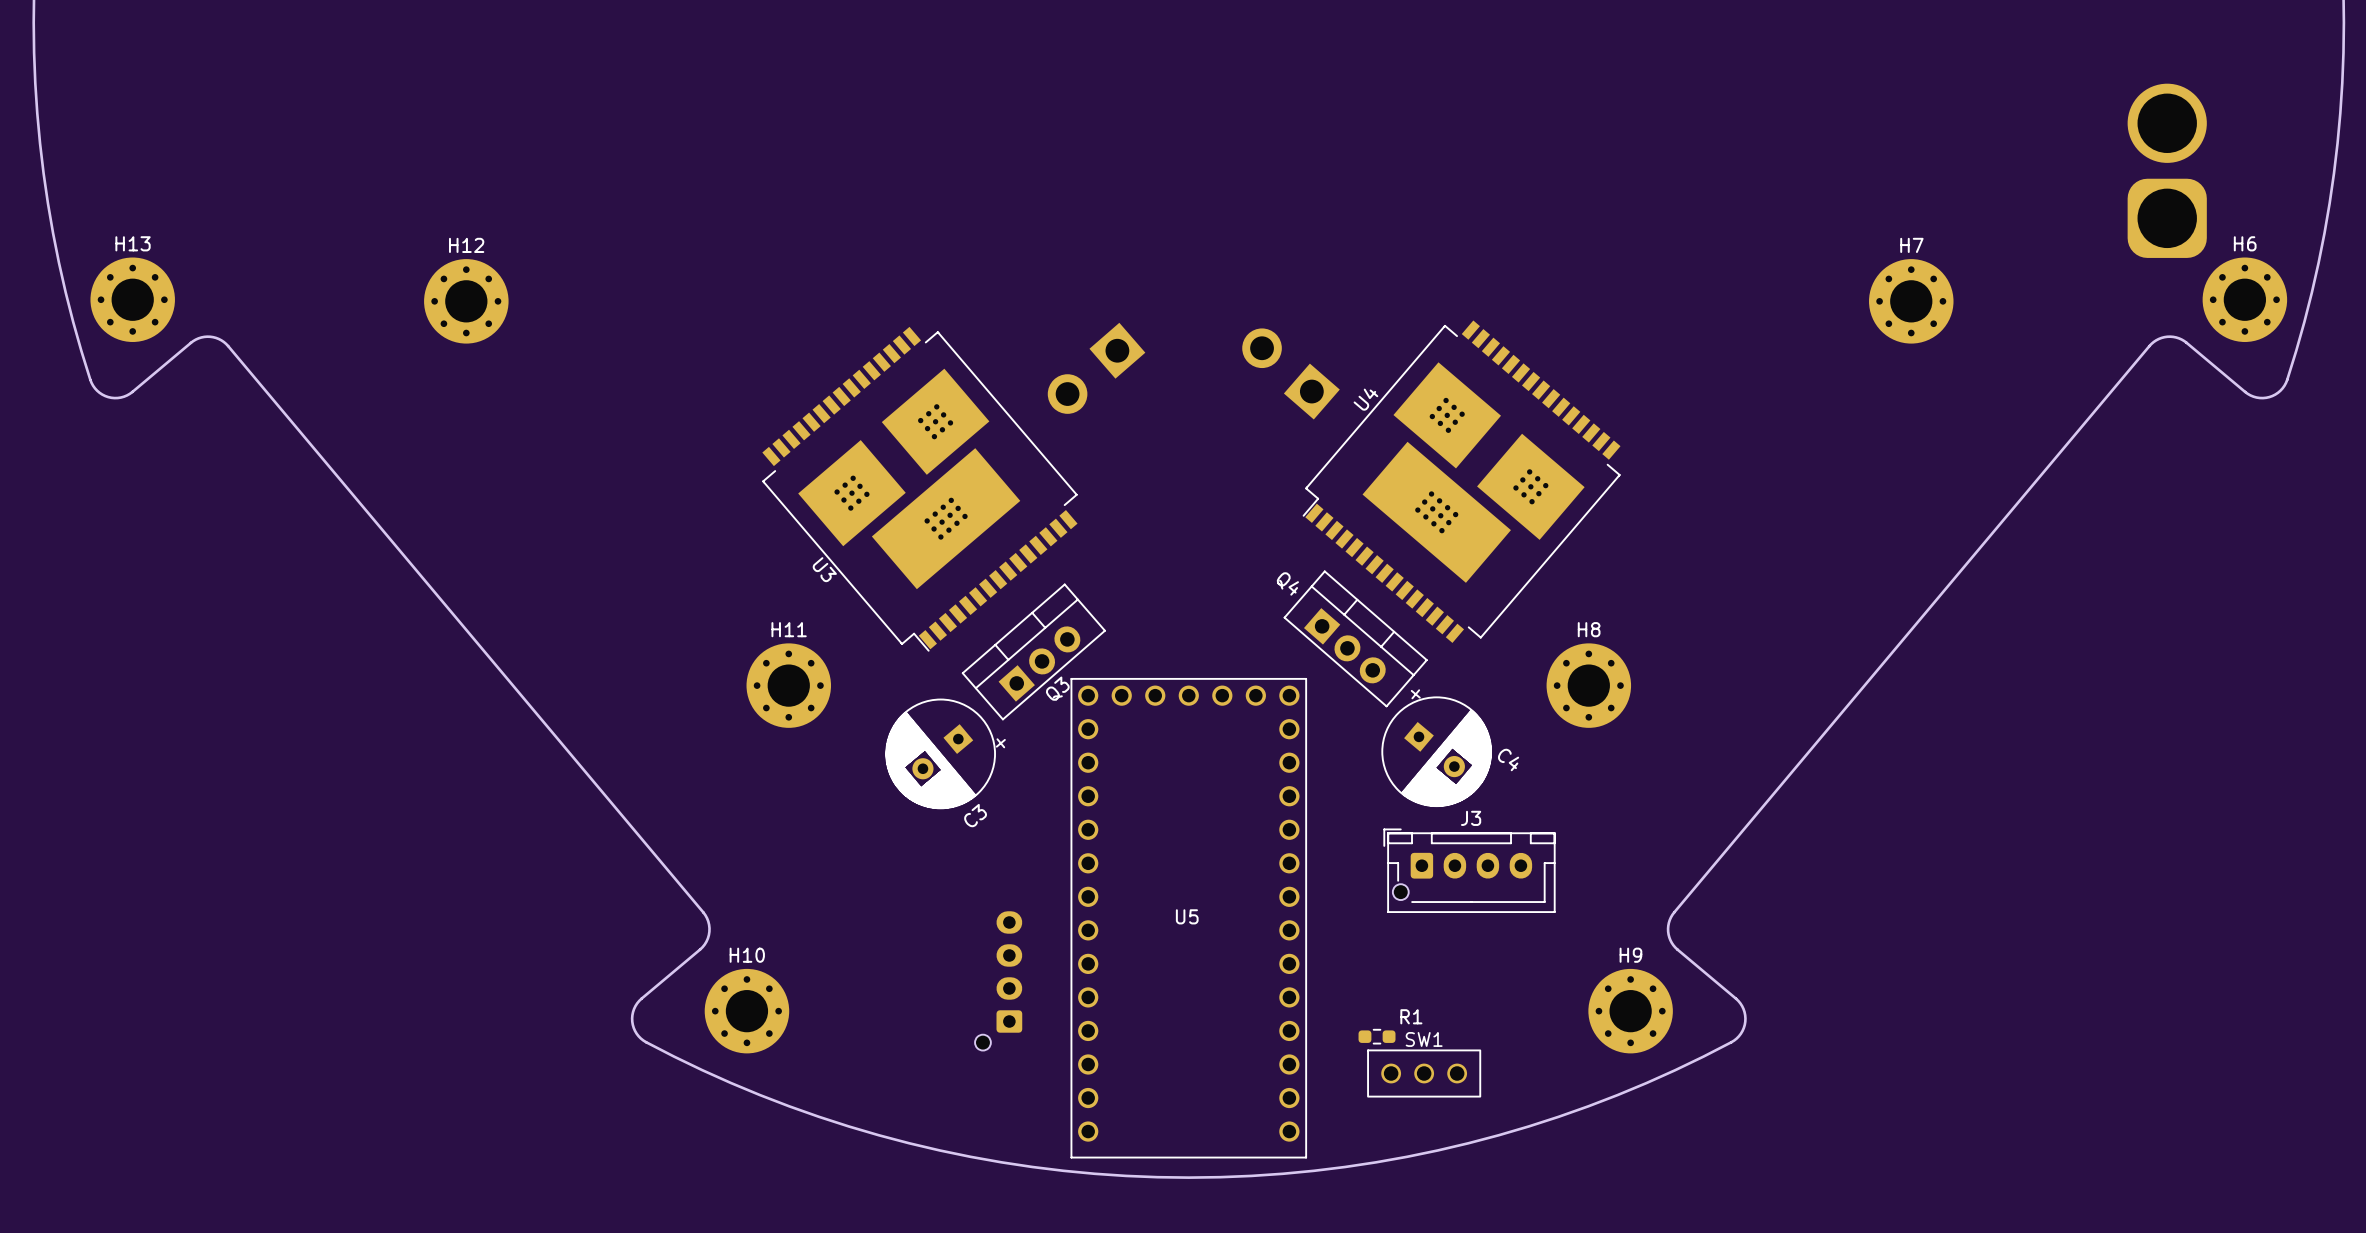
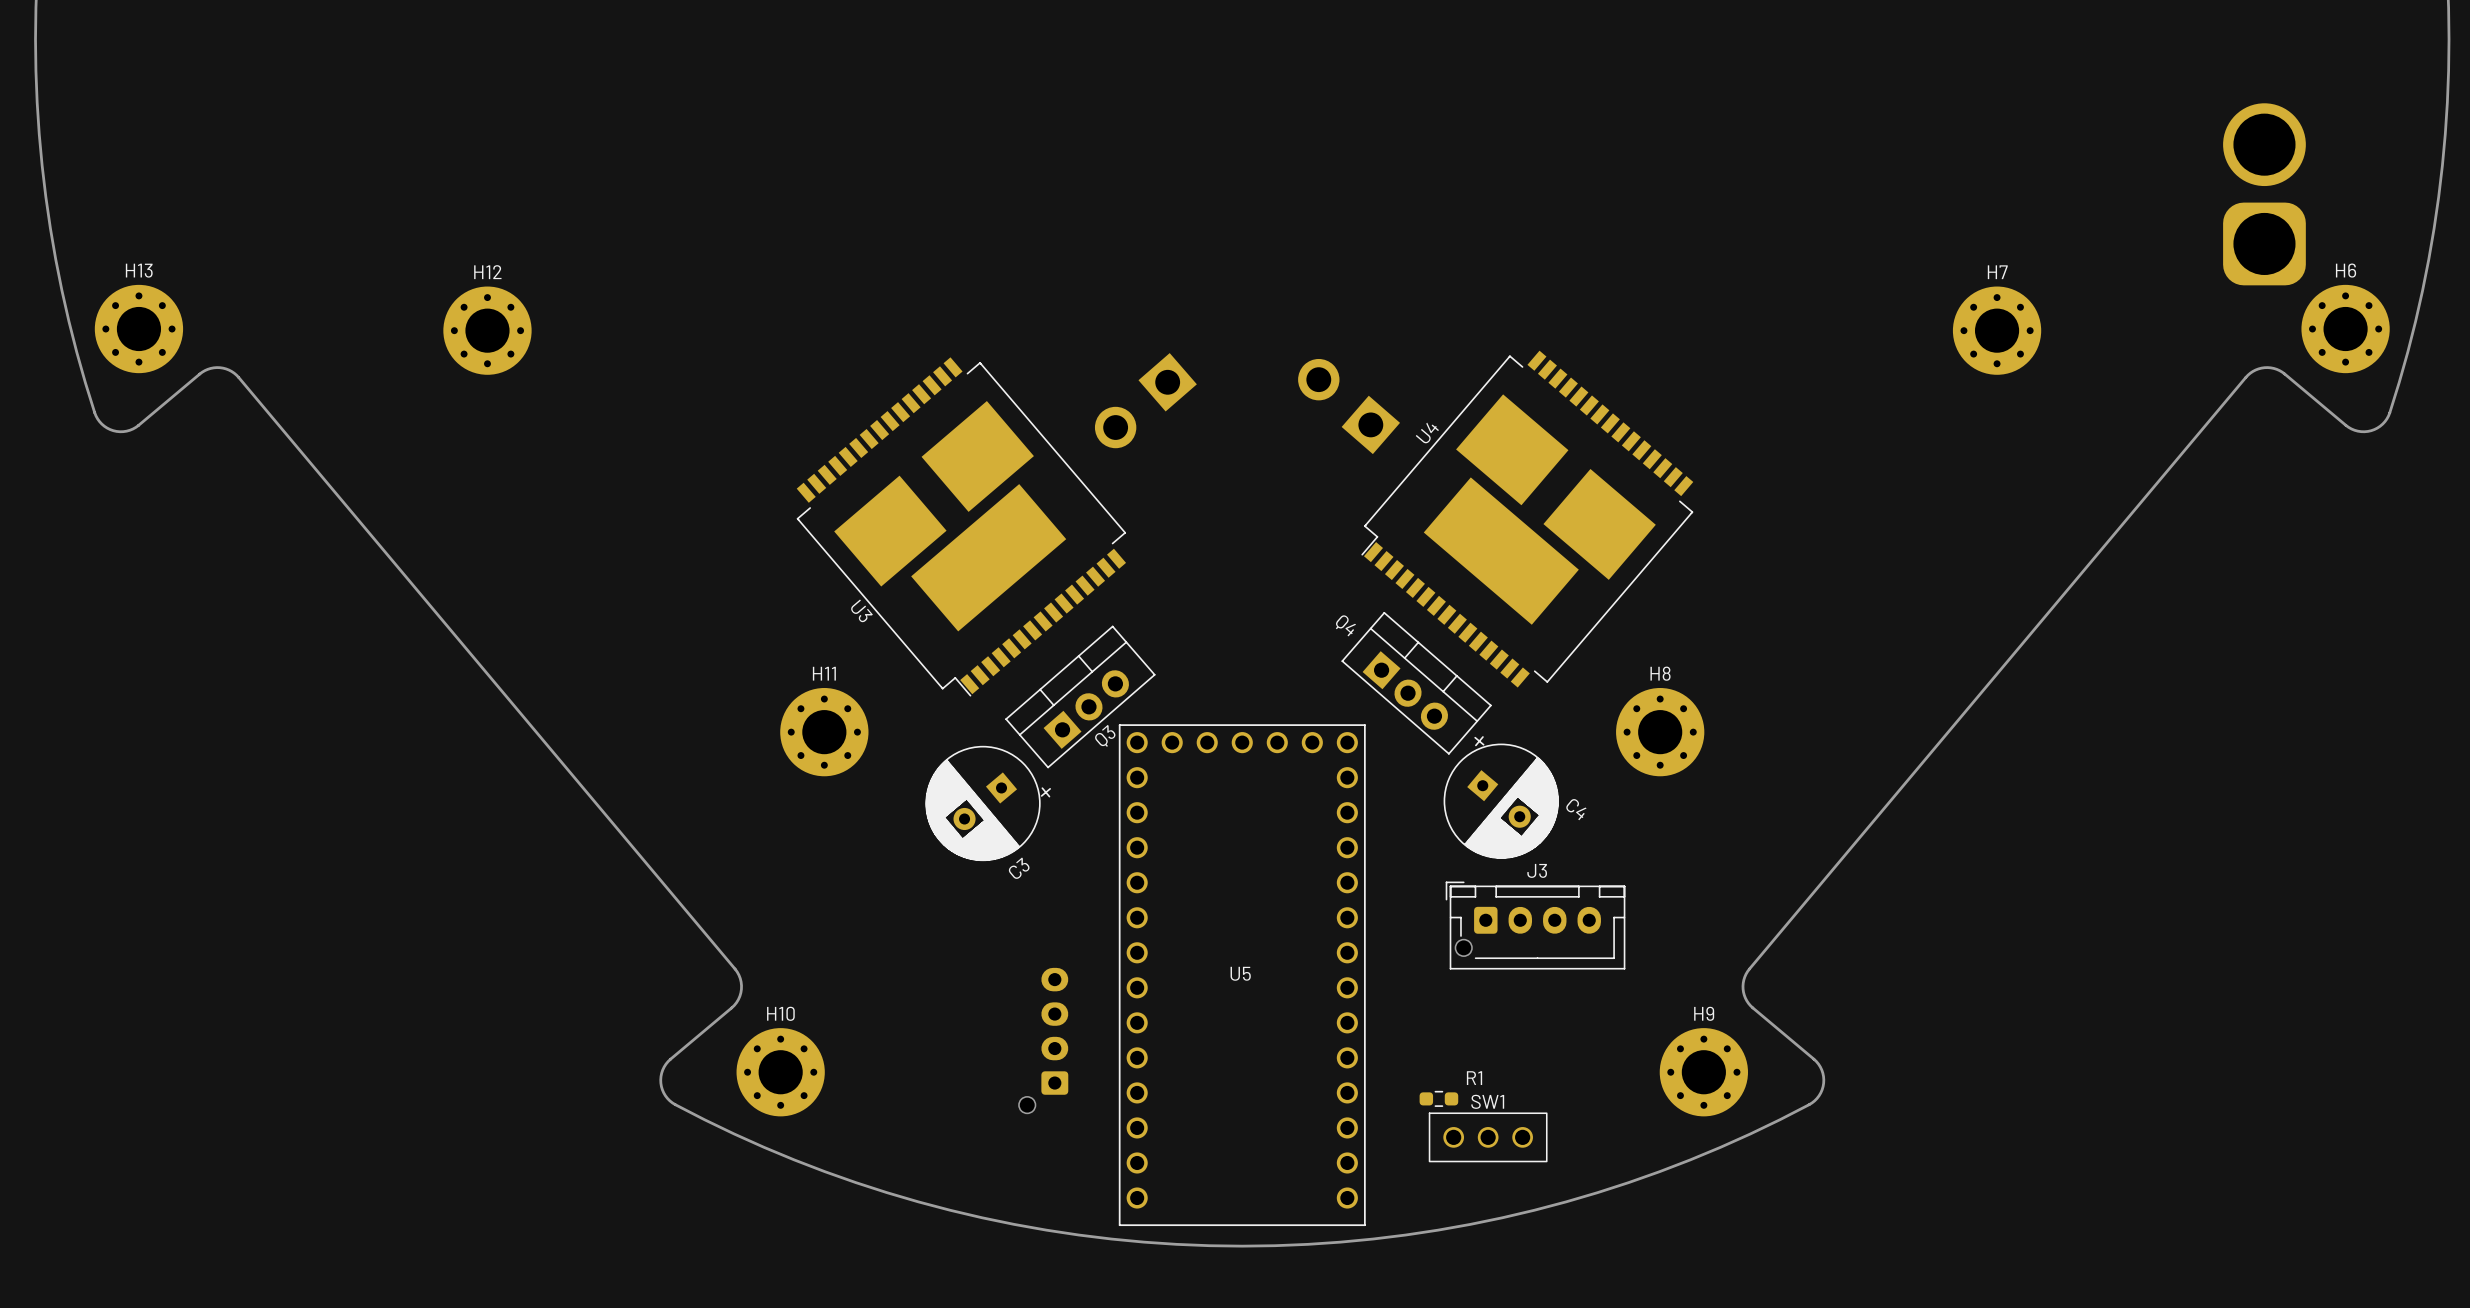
U4 footprint: [1302, 320, 1621, 643] -> [1361, 350, 1694, 688]
U3 footprint: [762, 326, 1078, 652] -> [796, 357, 1127, 697]

